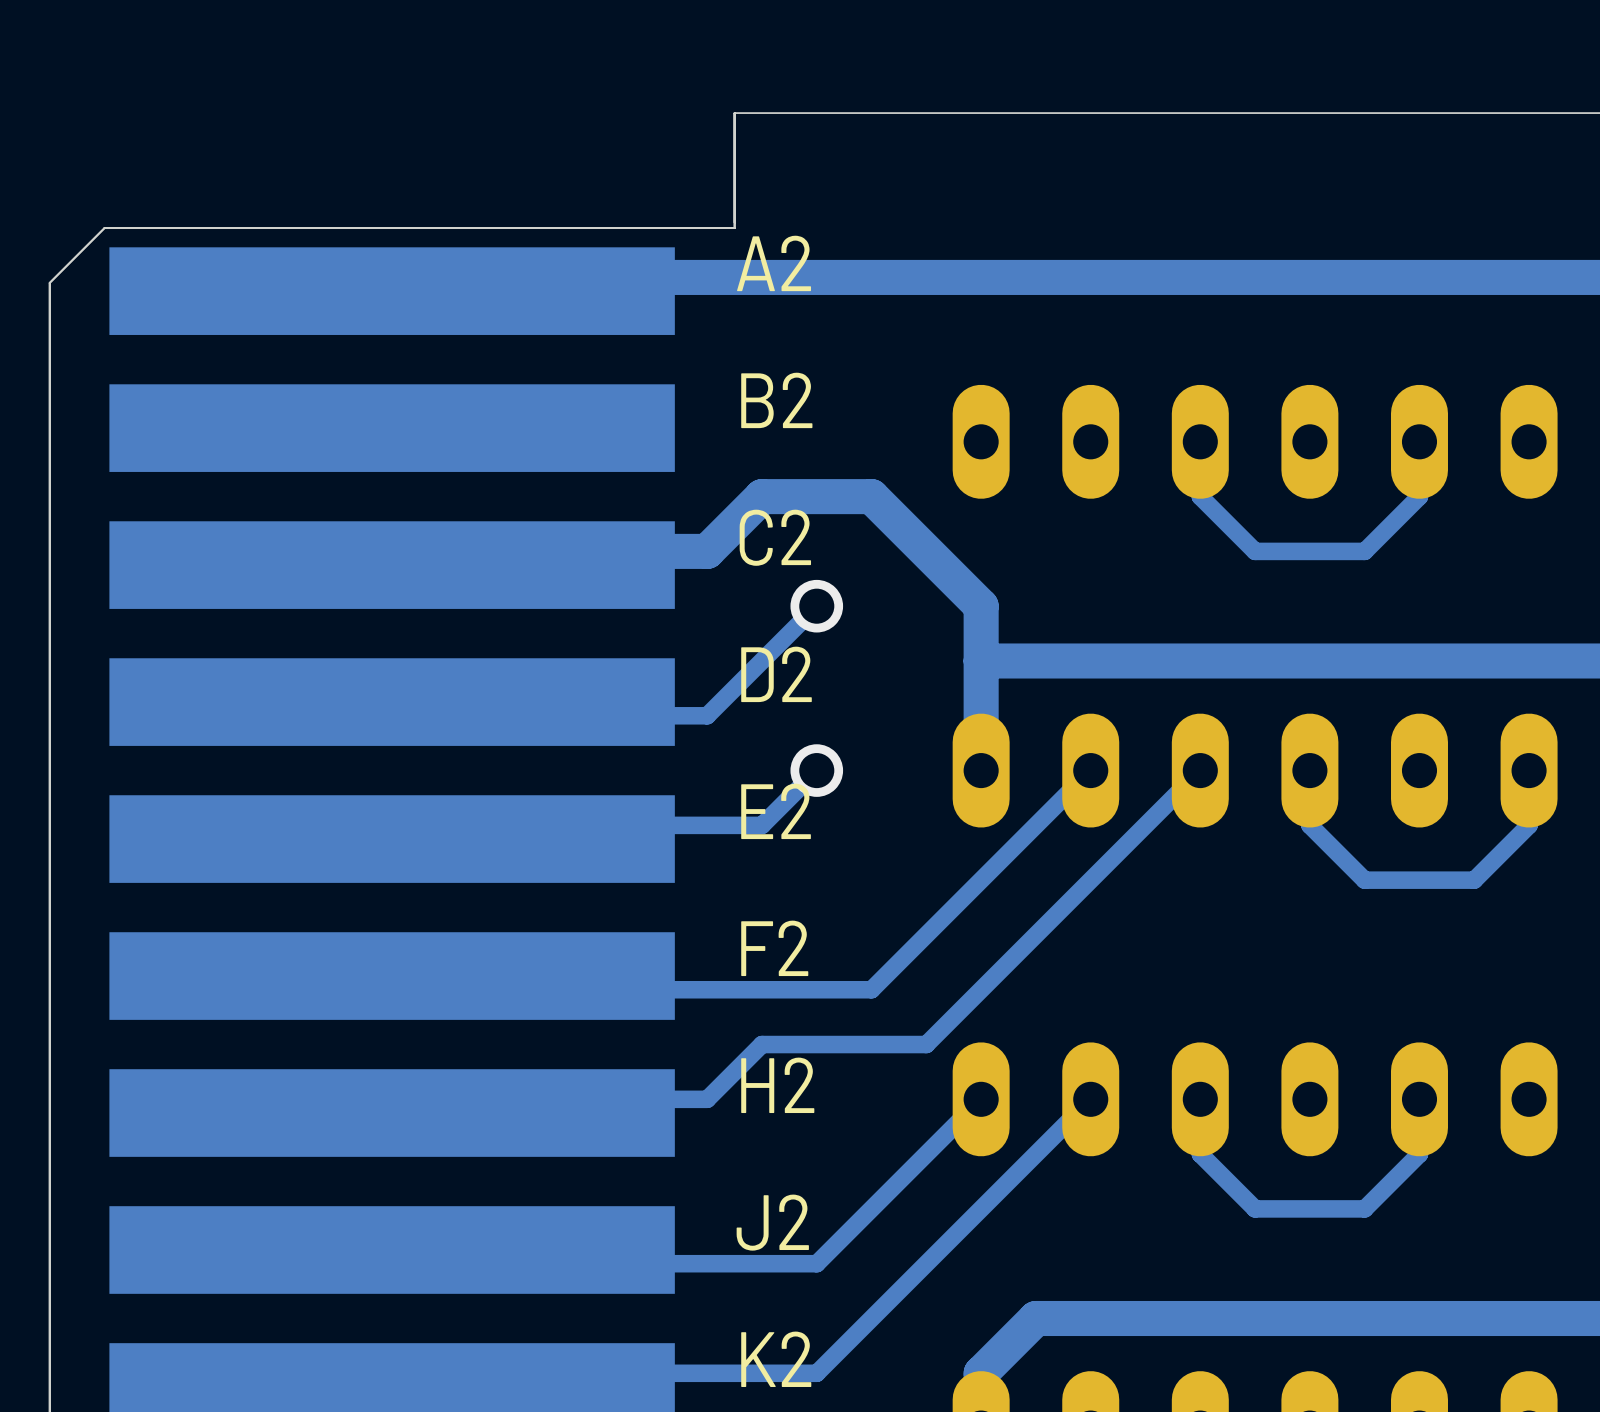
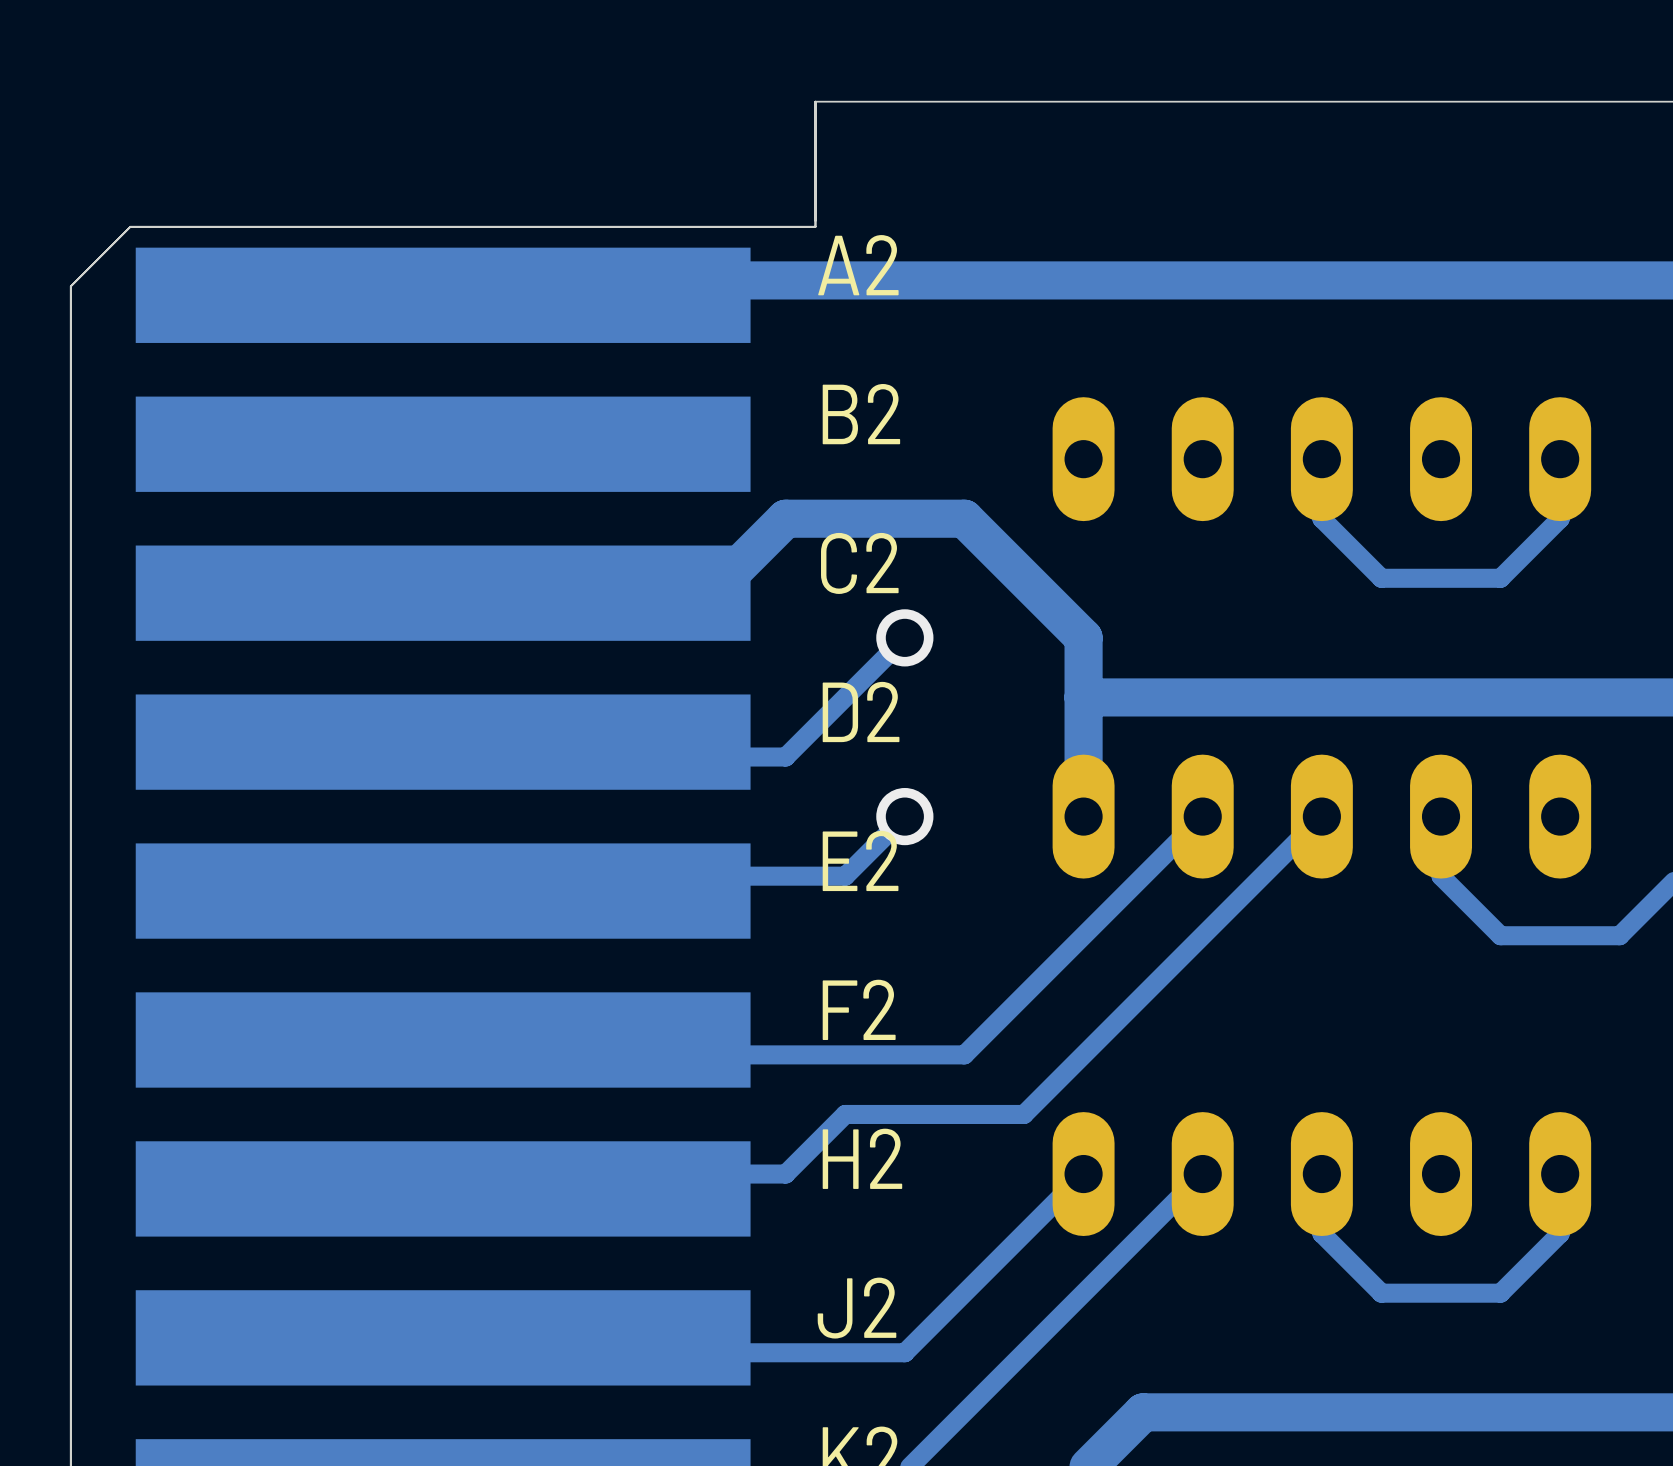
track: (761, 496) (707, 551) (652, 551) -> (845, 518) (785, 518) (726, 578)

